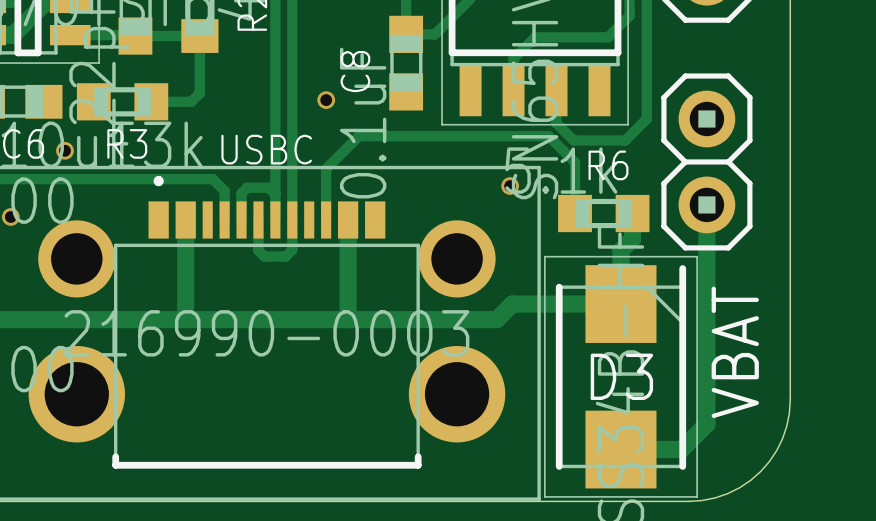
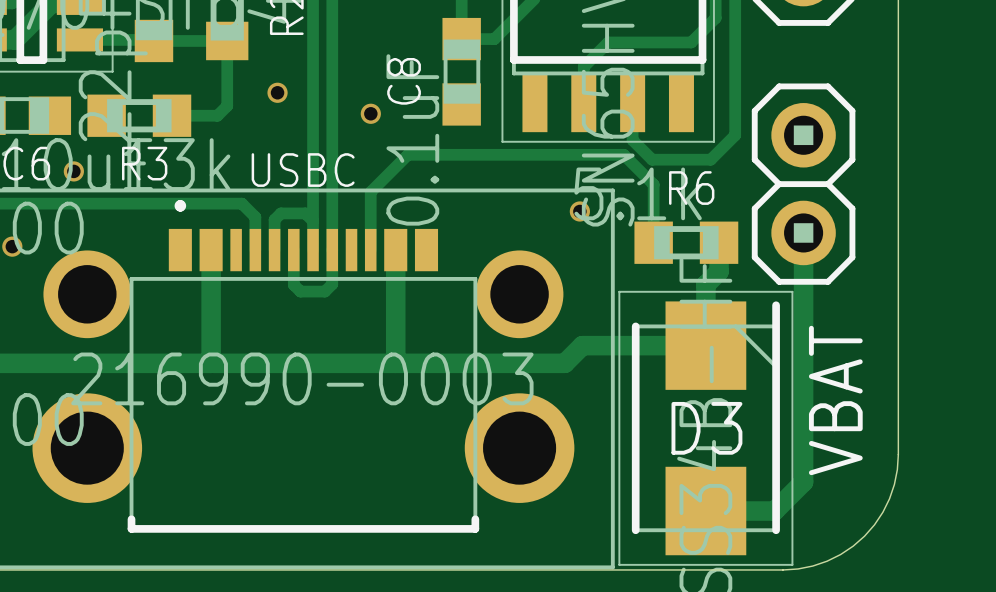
via: none -> (277, 92)

